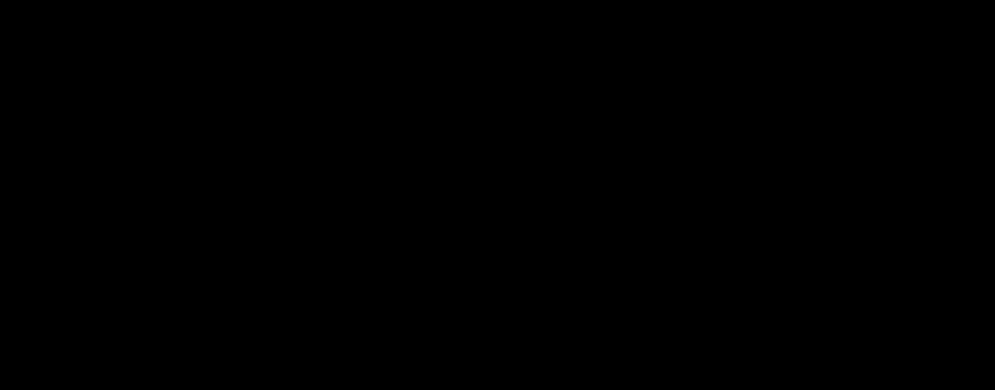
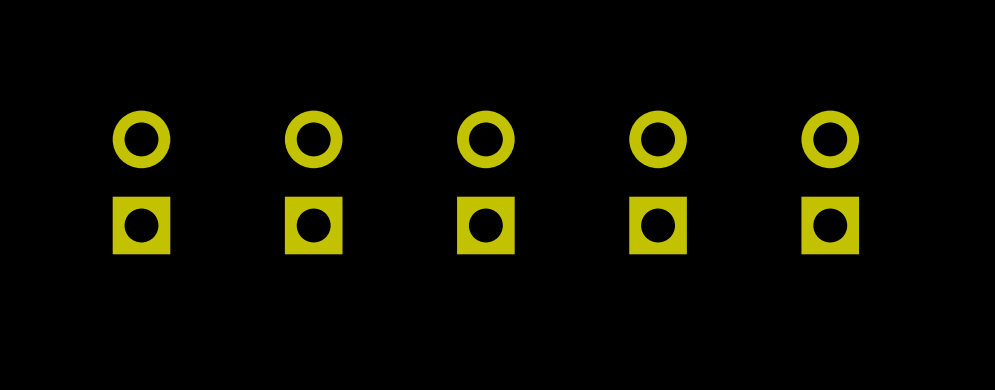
part: none -> (141, 182)
part: none -> (313, 182)
part: none -> (485, 182)
part: none -> (658, 182)
part: none -> (830, 182)

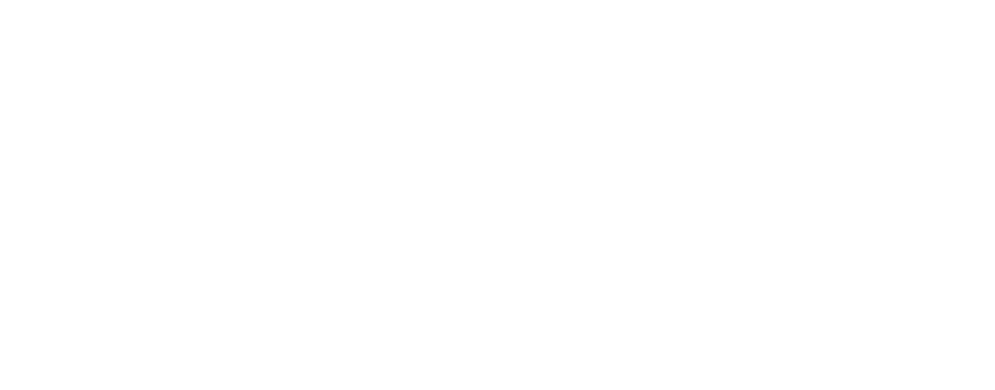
part: (141, 182) -> none
part: (313, 182) -> none
part: (485, 182) -> none
part: (658, 182) -> none
part: (830, 182) -> none

